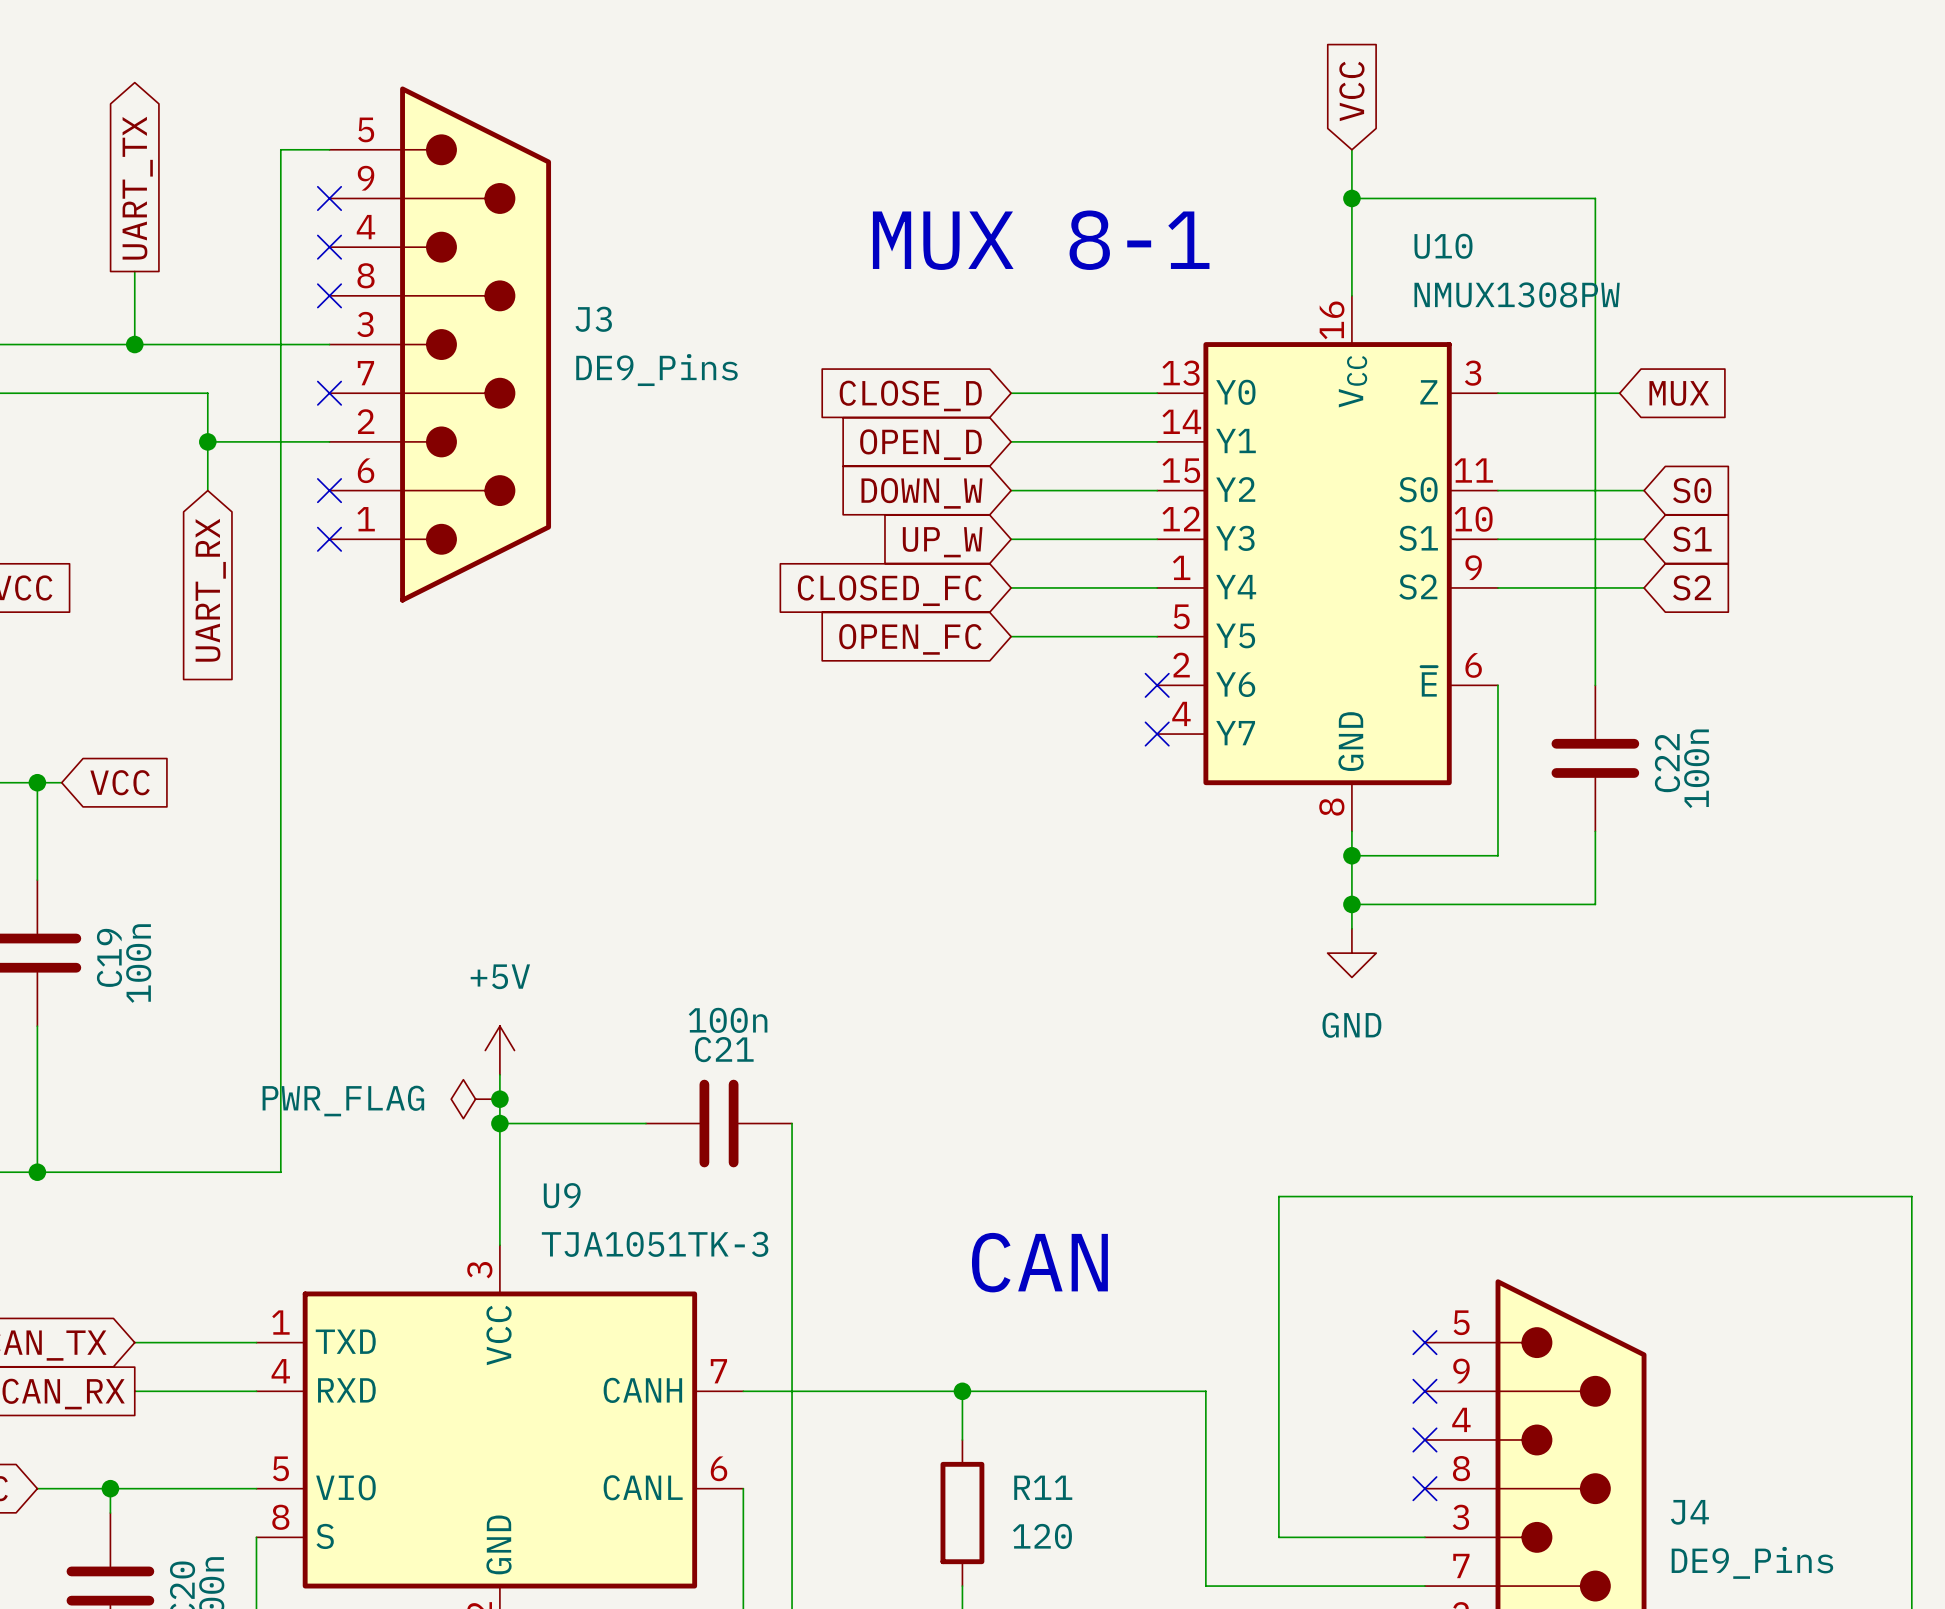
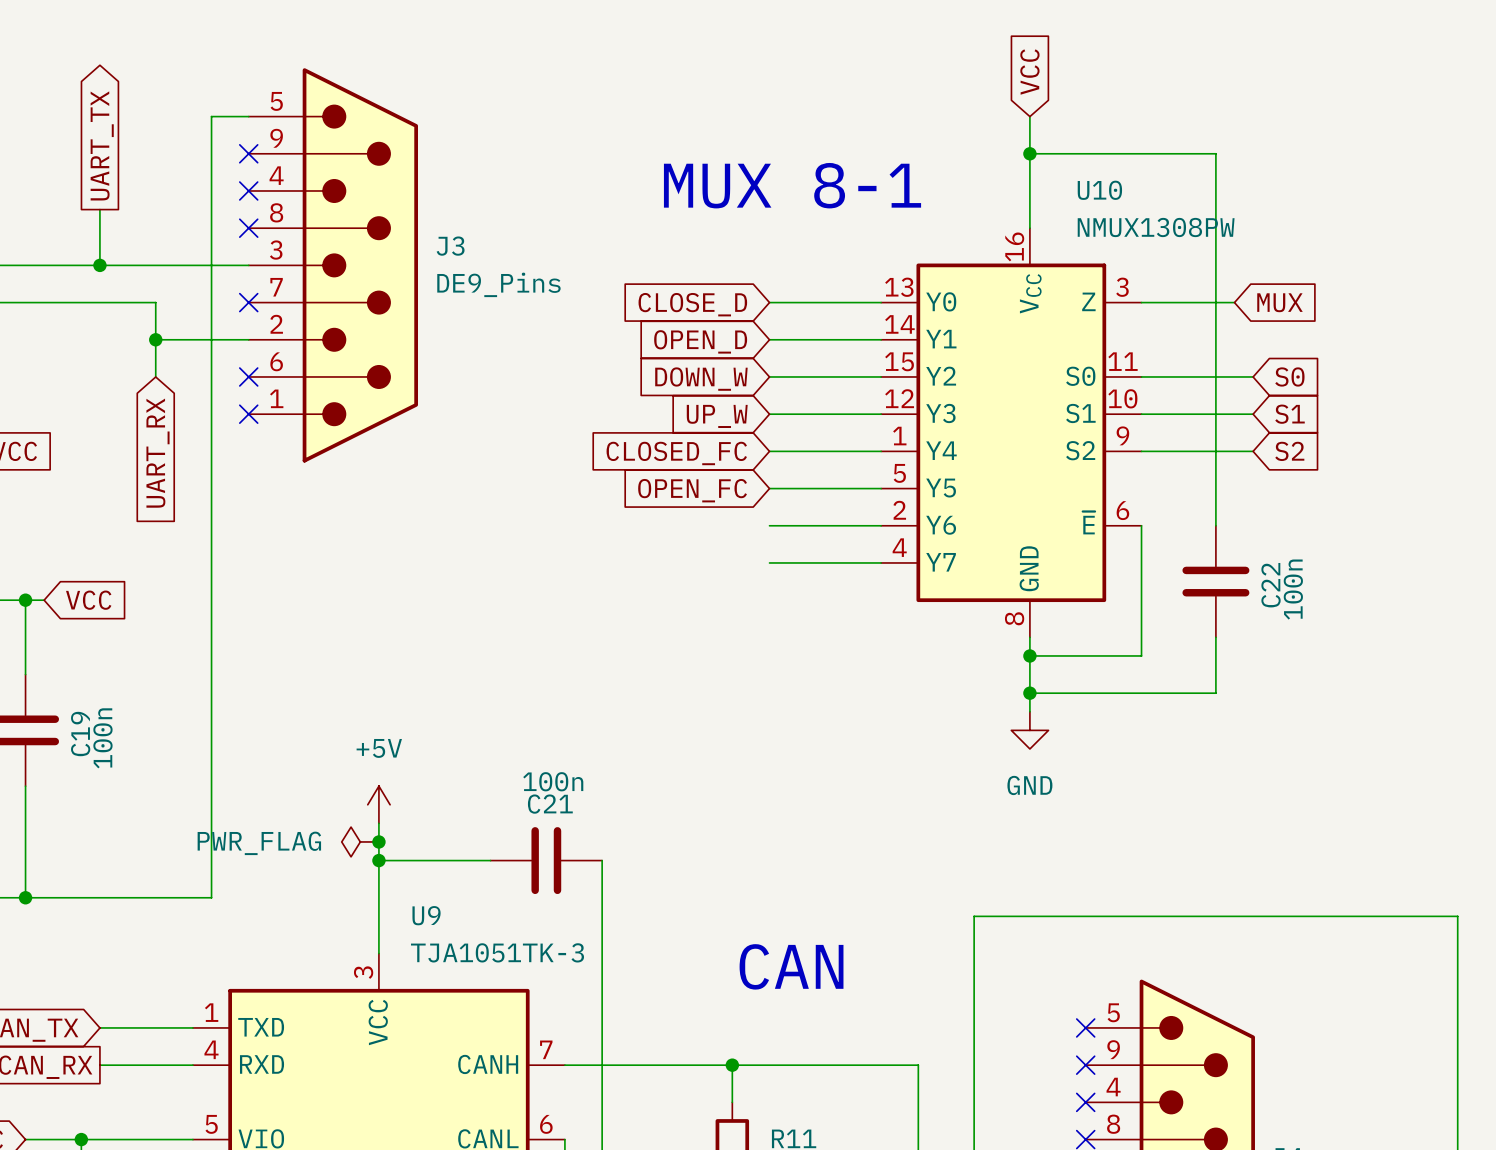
wire: none -> (769, 525) (881, 525)
no-connect mark: (1157, 685) -> none
wire: none -> (769, 562) (881, 562)
no-connect mark: (1157, 734) -> none

